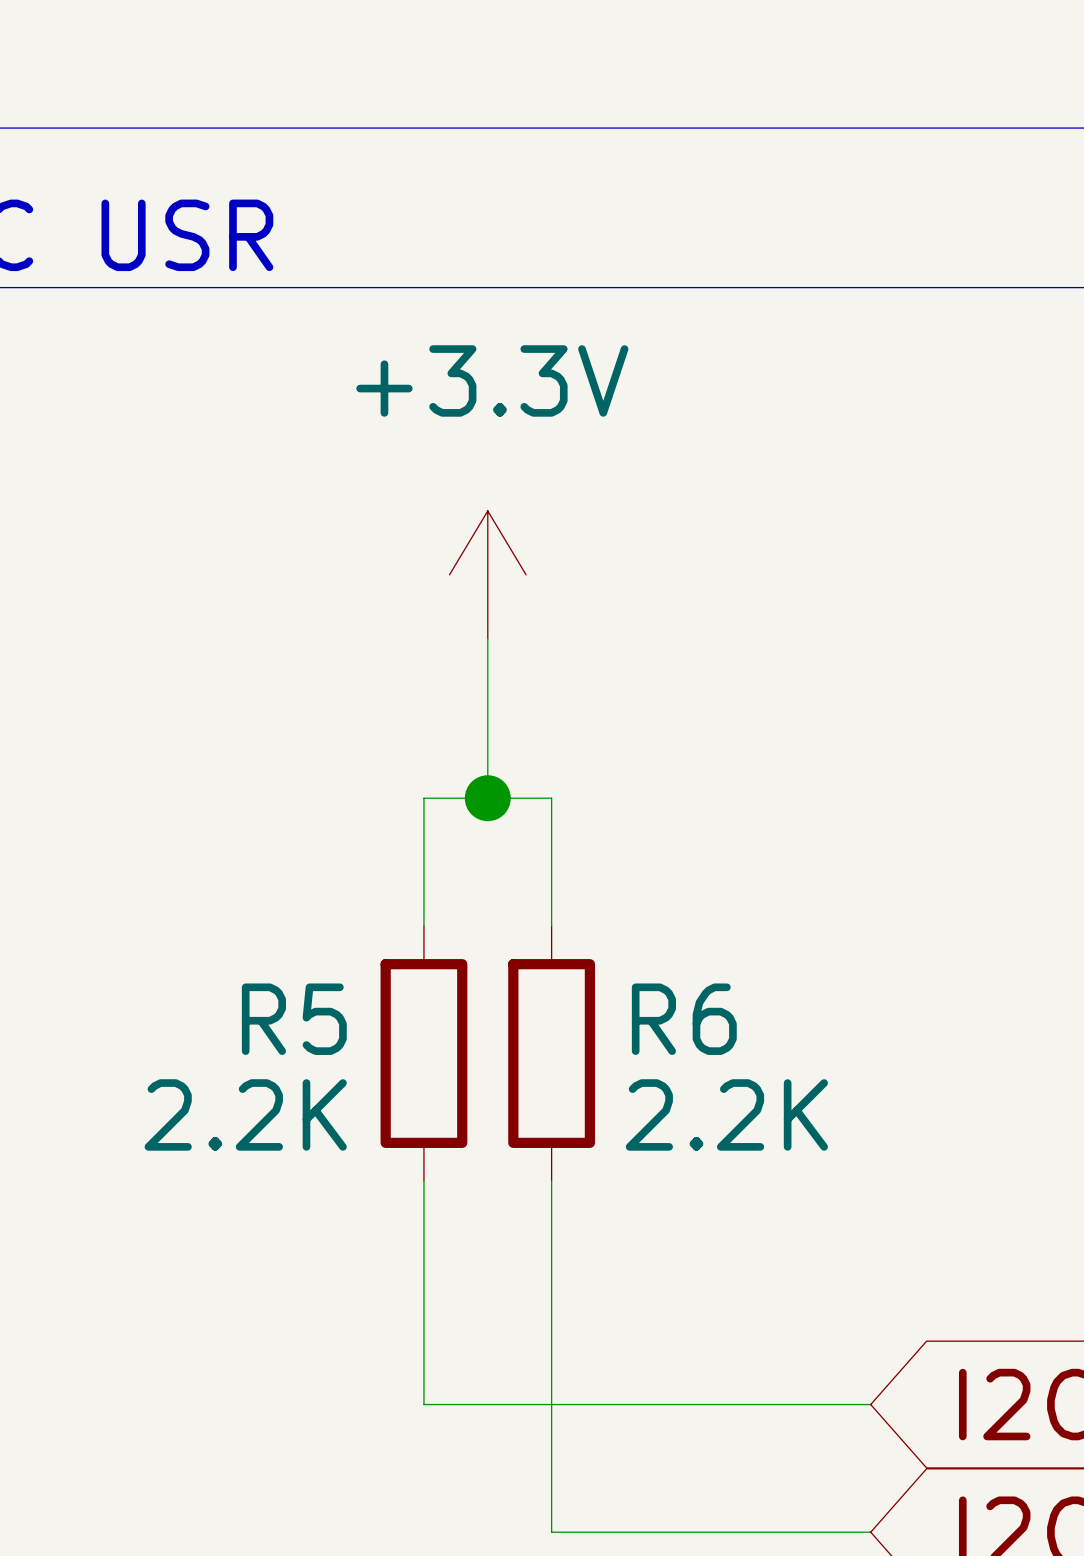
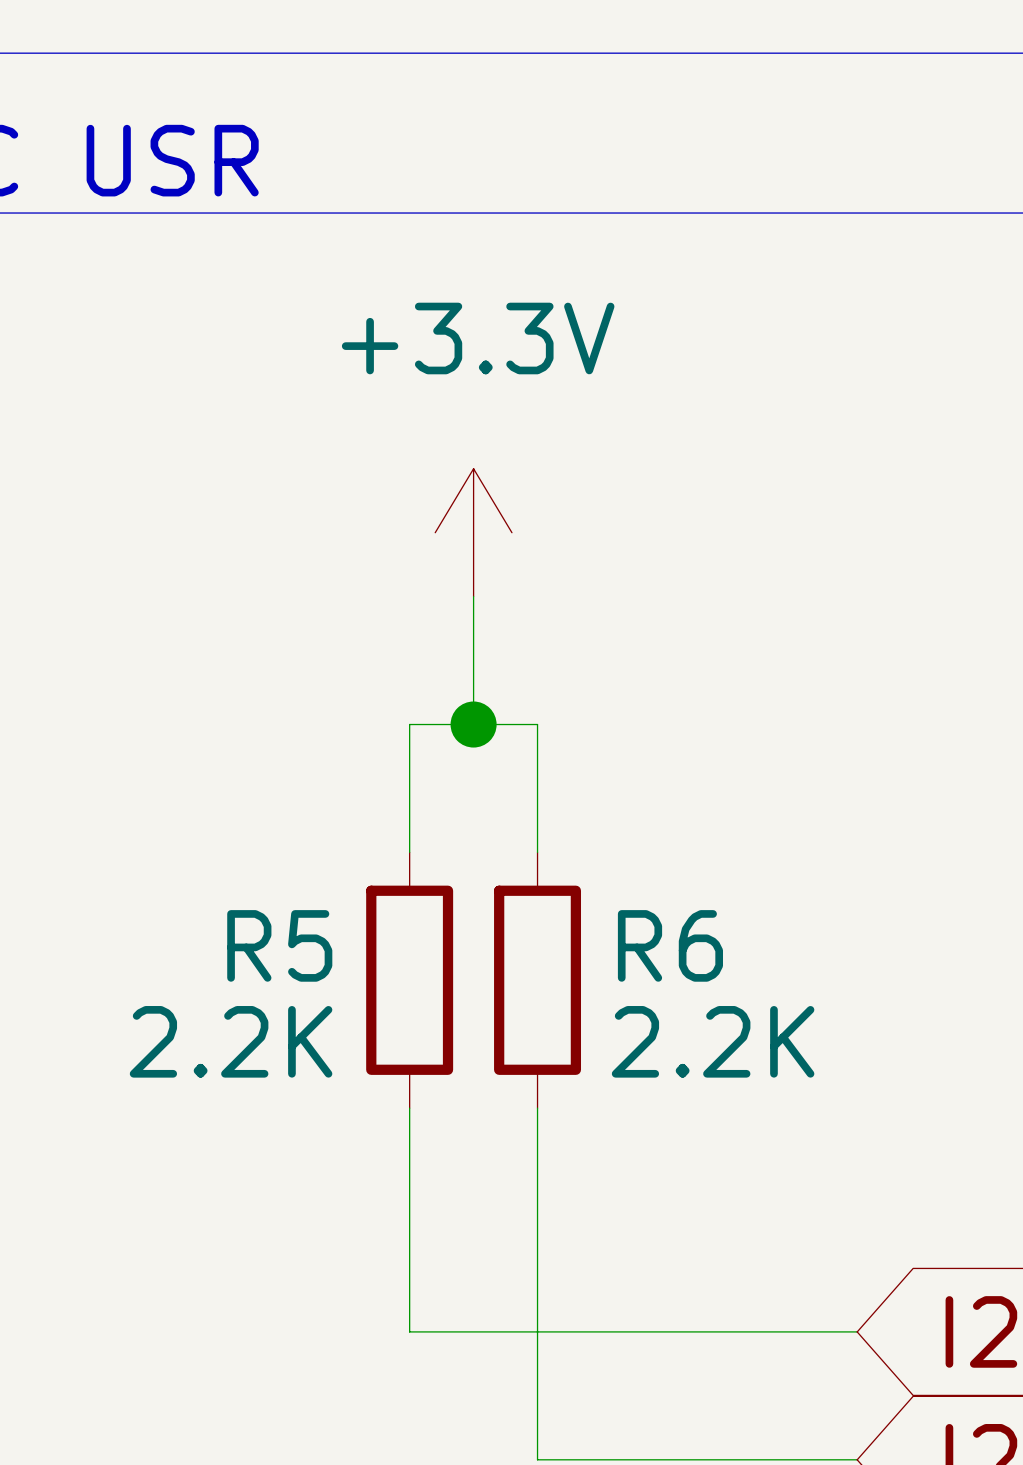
power symbol position: +3.3V (487, 574) -> +3.3V (473, 532)

